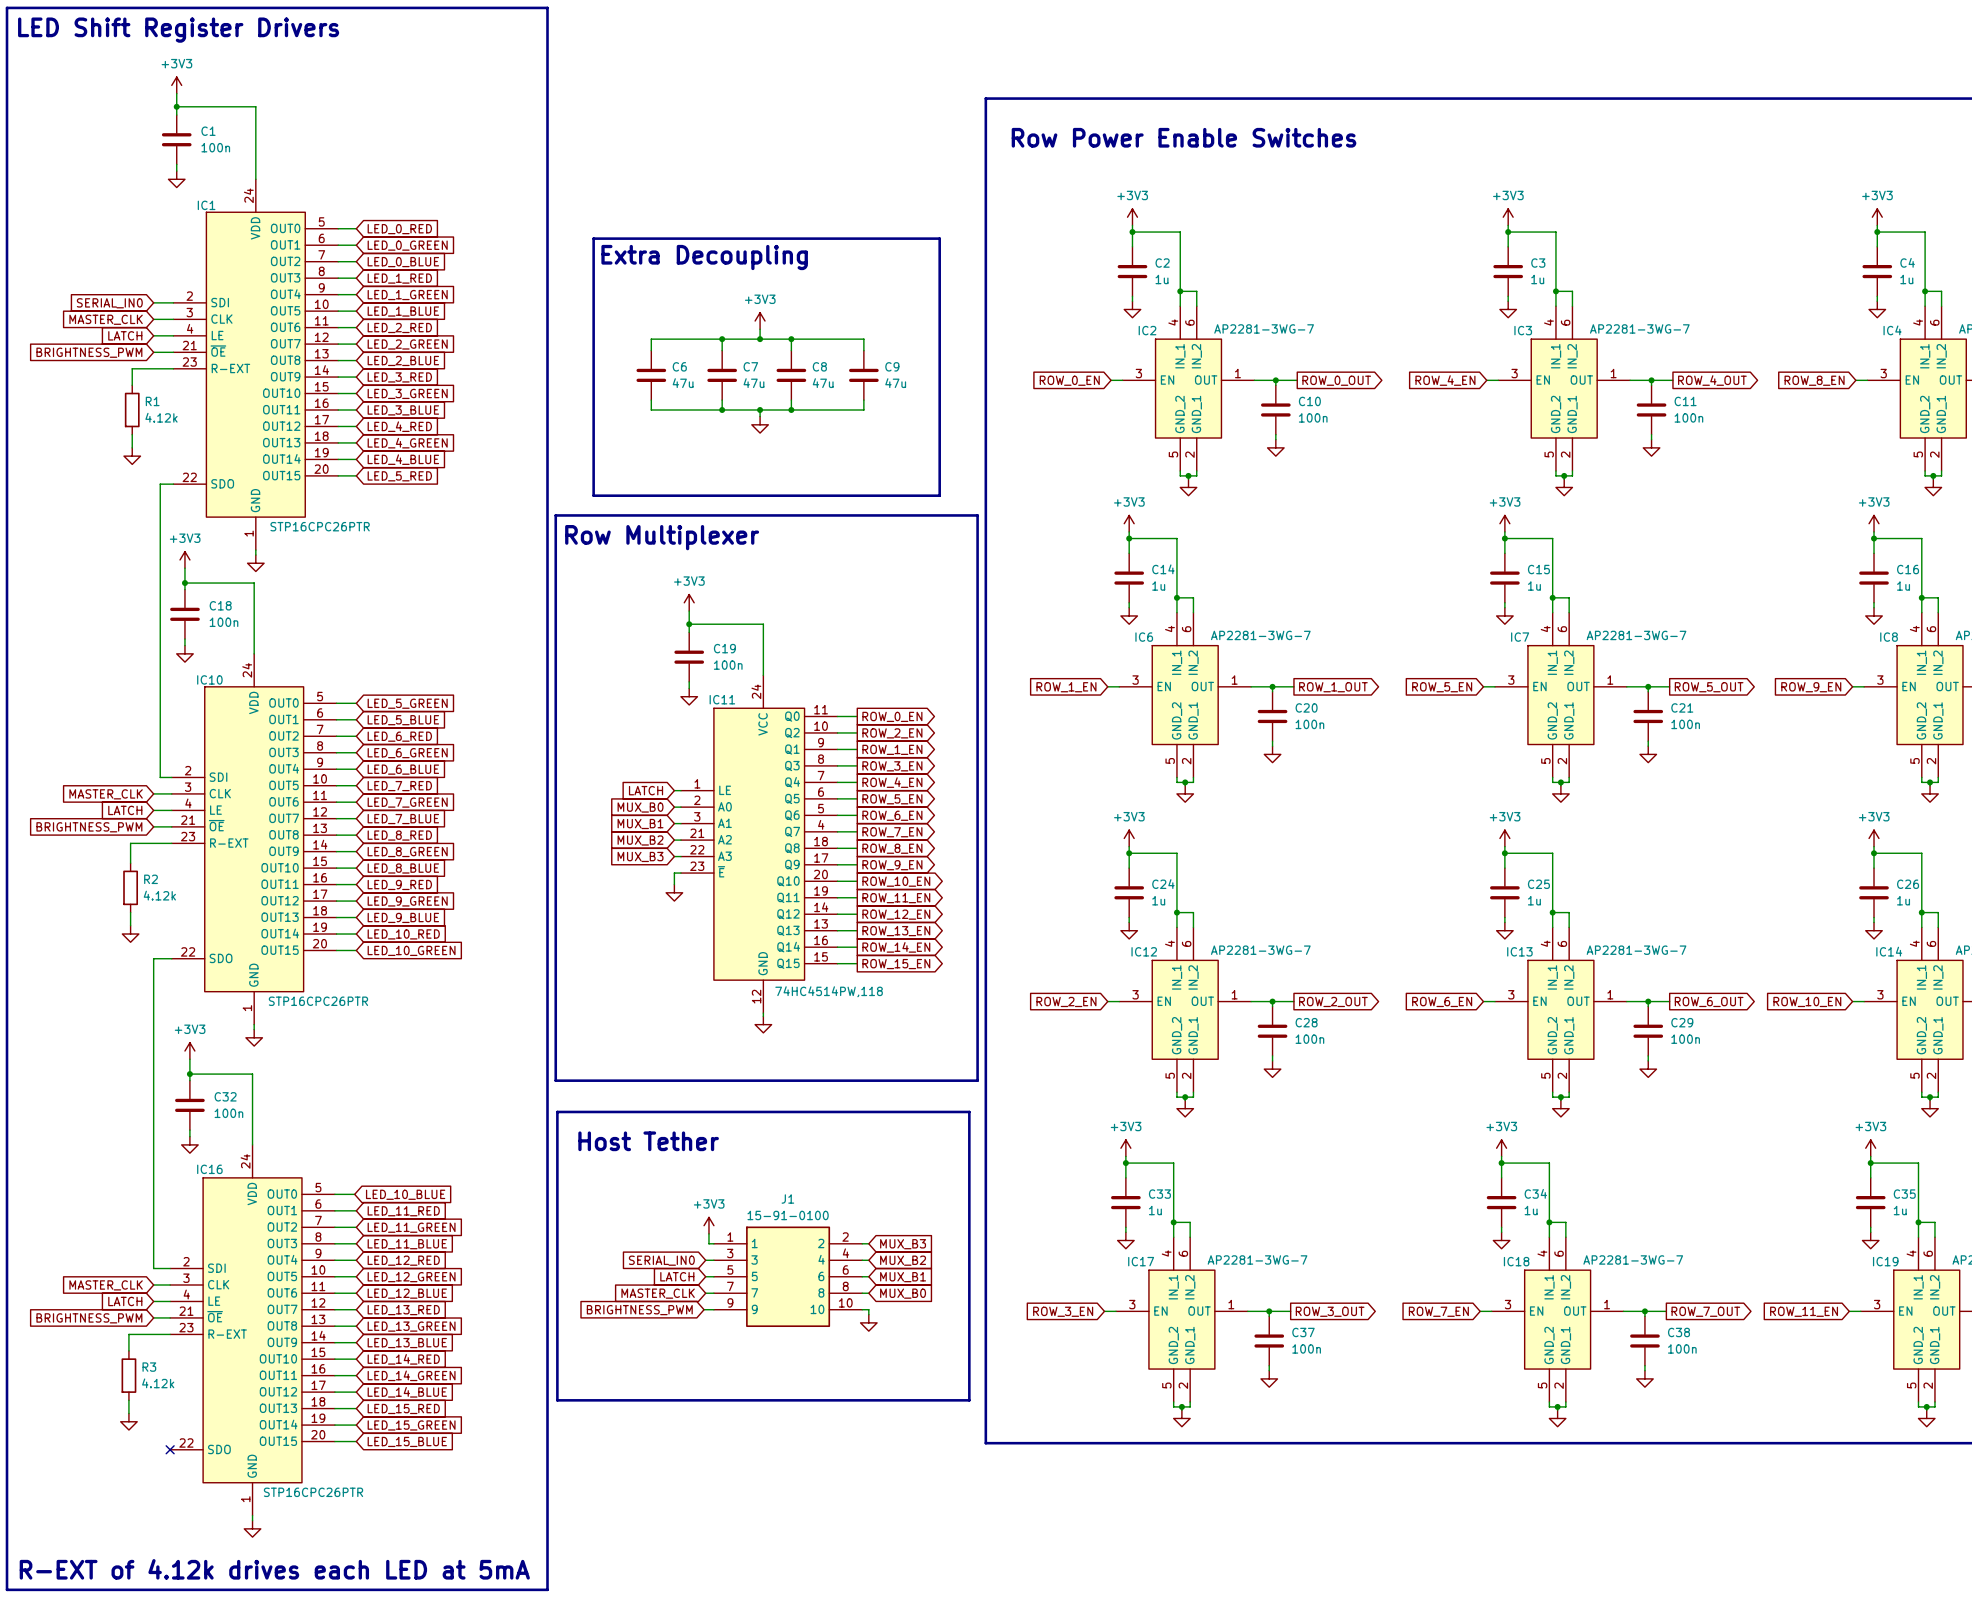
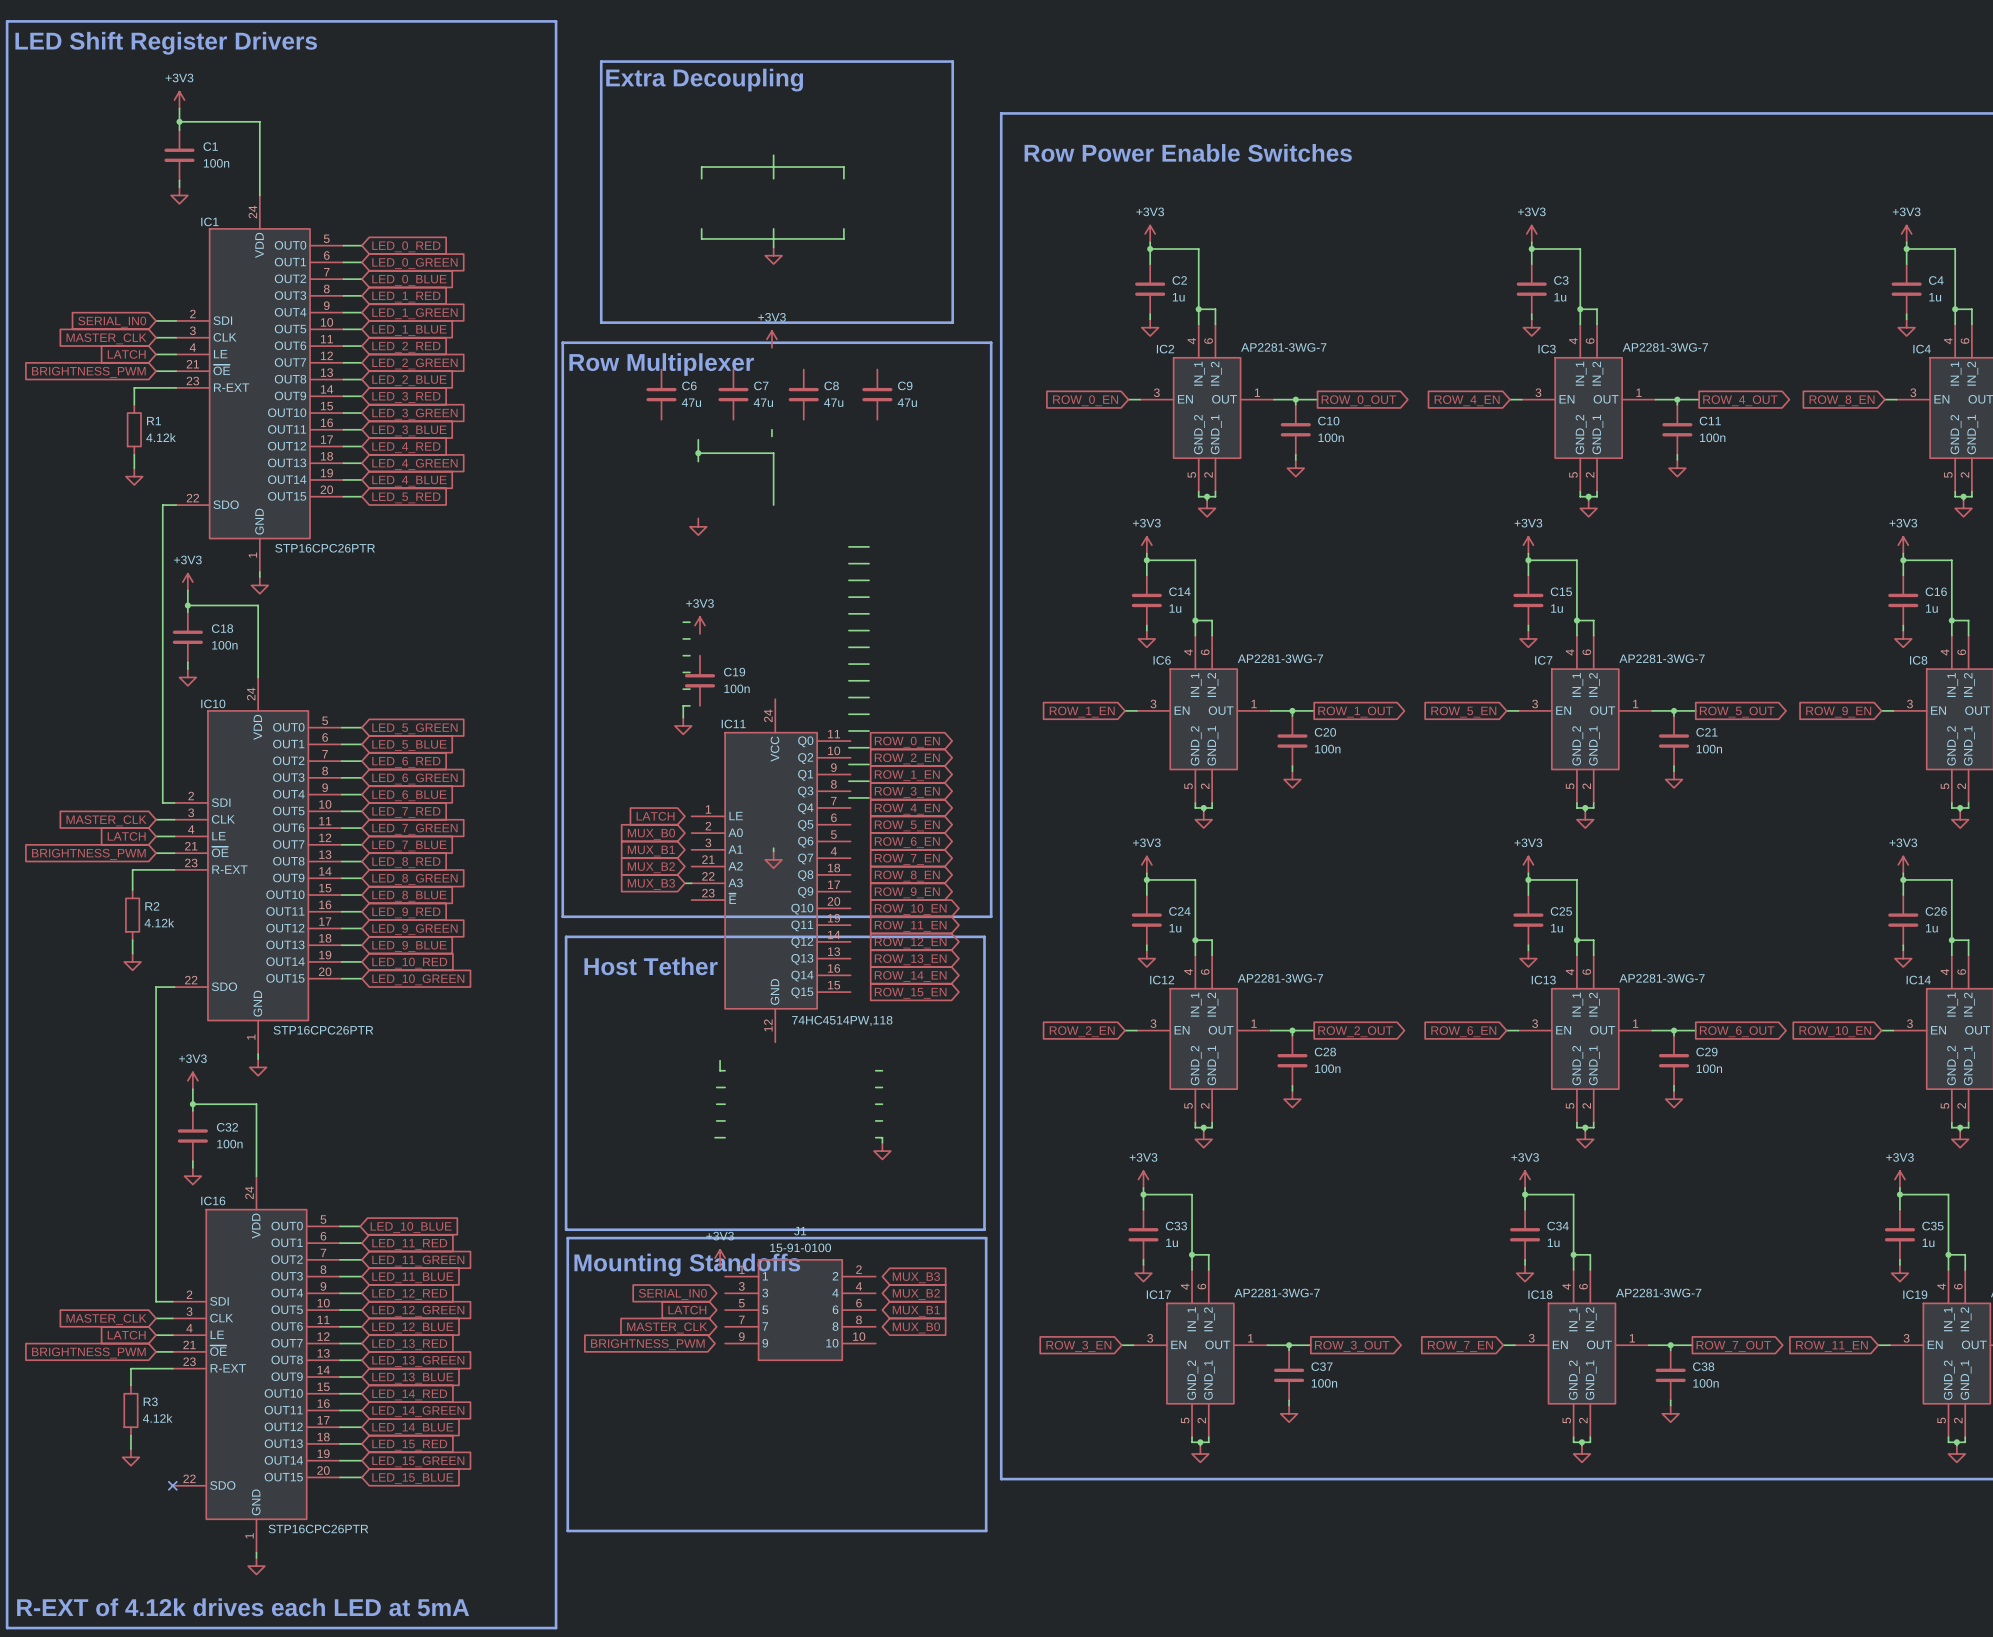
line: none -> (601, 61) (952, 61) (952, 322) (601, 322) (601, 61)
text: none -> Extra Decoupling (704, 80)
wire: none -> (773, 155) (773, 178)
wire: none -> (701, 178) (701, 167) (843, 167) (843, 178)
wire: none -> (701, 228) (701, 238) (843, 238) (843, 228)
wire: none -> (773, 228) (773, 247)
line: (593, 238) (939, 238) (939, 495) (593, 495) (593, 238) -> none
power symbol: none -> (773, 255)
text: Extra Decoupling (704, 257) -> none
line: none -> (562, 342) (991, 342) (991, 916) (562, 916) (562, 342)
wire: (760, 329) (760, 339) -> none
wire: (722, 339) (722, 350) -> none
junction: (722, 339) -> none
junction: (760, 339) -> none
wire: (791, 339) (791, 350) -> none
junction: (791, 339) -> none
text: none -> Row Multiplexer (661, 364)
wire: (651, 350) (651, 339) (863, 339) (863, 350) -> none
wire: (651, 400) (651, 409) (863, 409) (863, 400) -> none
wire: (722, 400) (722, 409) -> none
wire: (791, 400) (791, 409) -> none
junction: (722, 409) -> none
junction: (760, 409) -> none
junction: (791, 409) -> none
wire: none -> (698, 439) (698, 461)
power symbol: (760, 424) -> none
wire: none -> (698, 453) (773, 453) (773, 505)
junction: none -> (698, 453)
power symbol: none -> (698, 526)
line: (555, 515) (977, 515) (977, 1080) (555, 1080) (555, 515) -> none
wire: none -> (848, 546) (869, 546)
text: Row Multiplexer (662, 537) -> none
wire: none -> (848, 563) (869, 563)
wire: none -> (683, 622) (689, 622)
wire: (689, 611) (689, 632) -> none
wire: none -> (683, 638) (689, 638)
wire: (689, 624) (763, 624) (763, 675) -> none
junction: (689, 624) -> none
wire: none -> (689, 705) (683, 705) (683, 717)
wire: (689, 681) (689, 688) -> none
power symbol position: (689, 696) -> (683, 725)
wire: (837, 716) (857, 716) -> (848, 580) (869, 580)
wire: (837, 732) (857, 732) -> (848, 597) (869, 597)
wire: (837, 749) (857, 749) -> (848, 613) (869, 613)
wire: (837, 765) (857, 765) -> (848, 630) (869, 630)
wire: (837, 782) (857, 782) -> (848, 647) (869, 647)
wire: (674, 790) (680, 790) -> (683, 655) (689, 655)
wire: (837, 798) (857, 798) -> (848, 664) (869, 664)
wire: (674, 807) (680, 807) -> (683, 672) (689, 672)
wire: (837, 815) (857, 815) -> (848, 680) (869, 680)
wire: (674, 823) (680, 823) -> (683, 689) (689, 689)
wire: (837, 831) (857, 831) -> (848, 697) (869, 697)
power symbol: none -> (773, 859)
wire: (674, 840) (680, 840) -> none
wire: (837, 848) (857, 848) -> (848, 714) (869, 714)
wire: (837, 864) (857, 864) -> (848, 731) (869, 731)
wire: (680, 873) (674, 873) (674, 884) -> none
wire: (837, 881) (857, 881) -> (848, 747) (869, 747)
power symbol: (674, 892) -> none
wire: (837, 897) (857, 897) -> (848, 764) (869, 764)
wire: (837, 914) (857, 914) -> (848, 781) (869, 781)
wire: (837, 930) (857, 930) -> (848, 797) (869, 797)
text: none -> Host Tether (651, 966)
wire: (837, 947) (857, 947) -> none
wire: (837, 963) (857, 963) -> none
wire: (763, 1013) (763, 1016) -> none
power symbol: (763, 1024) -> none
wire: none -> (720, 1060) (720, 1070) (725, 1070)
wire: none -> (875, 1070) (882, 1070)
wire: none -> (716, 1087) (725, 1087)
wire: none -> (875, 1087) (882, 1087)
wire: none -> (716, 1104) (725, 1104)
wire: none -> (875, 1104) (882, 1104)
wire: none -> (716, 1120) (725, 1120)
wire: none -> (715, 1137) (725, 1137)
wire: none -> (875, 1137) (882, 1137) (882, 1142)
line: (557, 1111) (969, 1111) -> (566, 1142) (566, 936) (984, 936) (984, 1142)
power symbol: none -> (882, 1151)
text: Host Tether (648, 1141) -> none
line: (557, 1197) (557, 1400) (969, 1400) (969, 1197) -> (566, 1229) (984, 1229)
line: none -> (567, 1238) (986, 1238) (986, 1530) (567, 1530) (567, 1238)
text: none -> Mounting Standoffs (687, 1264)
wire: (708, 1233) (708, 1243) (713, 1243) -> none
wire: (862, 1243) (868, 1243) -> (875, 1120) (882, 1120)
wire: (705, 1260) (713, 1260) -> none
wire: (862, 1260) (868, 1260) -> none
wire: (705, 1276) (713, 1276) -> none
wire: (862, 1276) (868, 1276) -> none
wire: (705, 1293) (713, 1293) -> none
wire: (862, 1293) (868, 1293) -> none
wire: (704, 1309) (713, 1309) -> none
wire: (862, 1309) (868, 1309) (868, 1314) -> none
power symbol: (868, 1322) -> none

